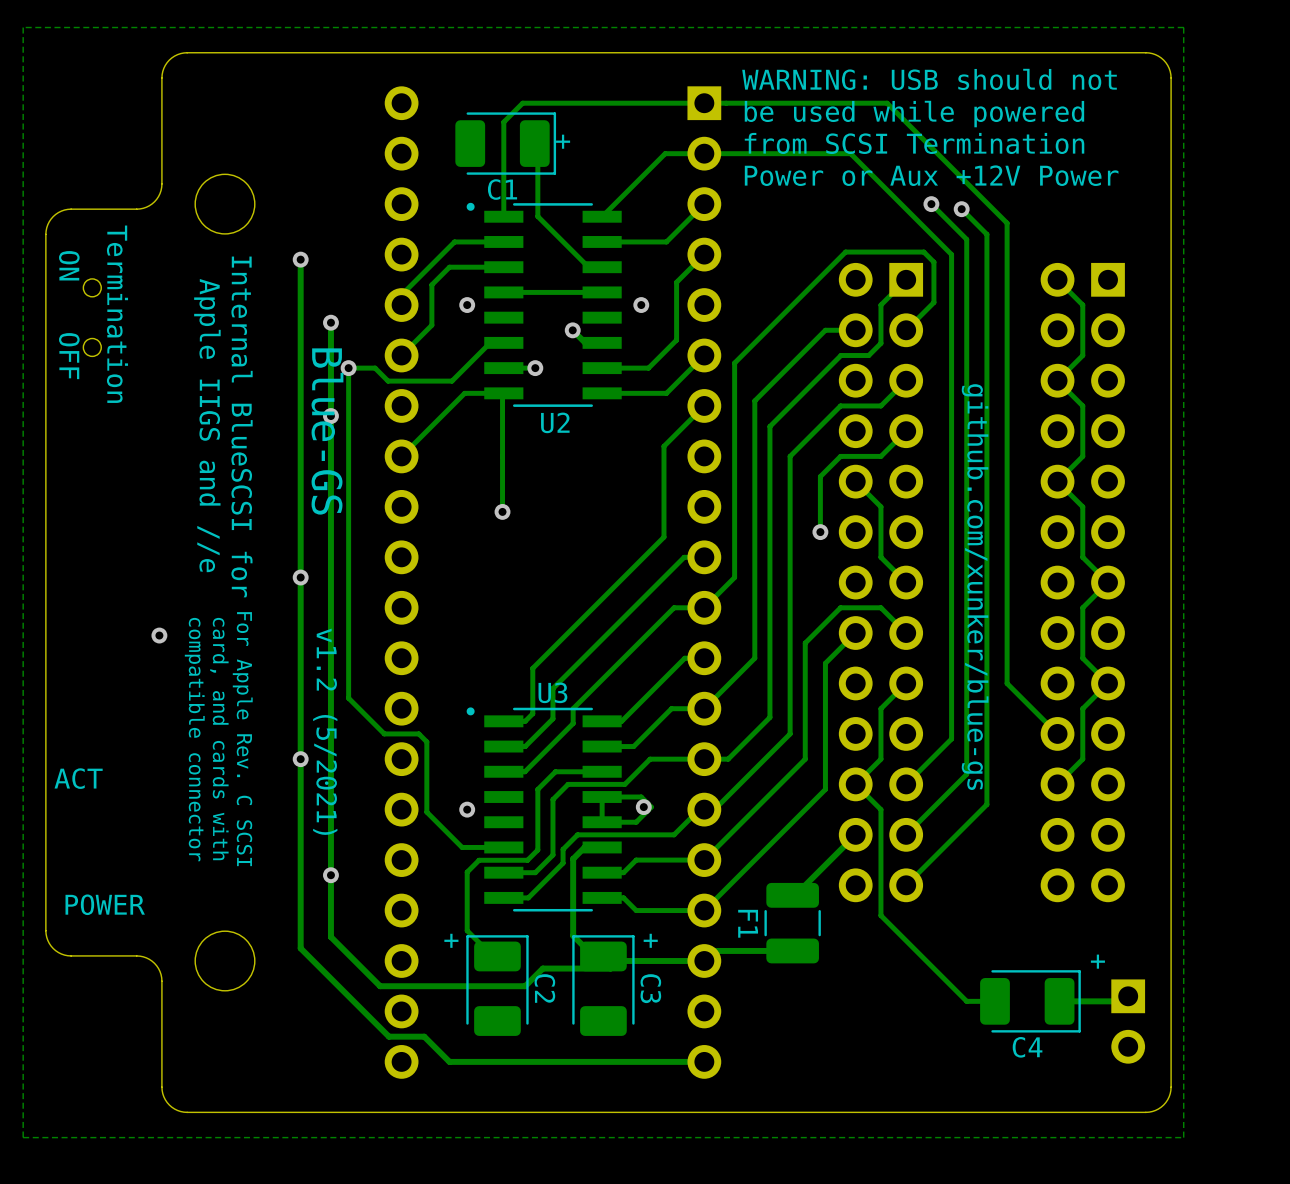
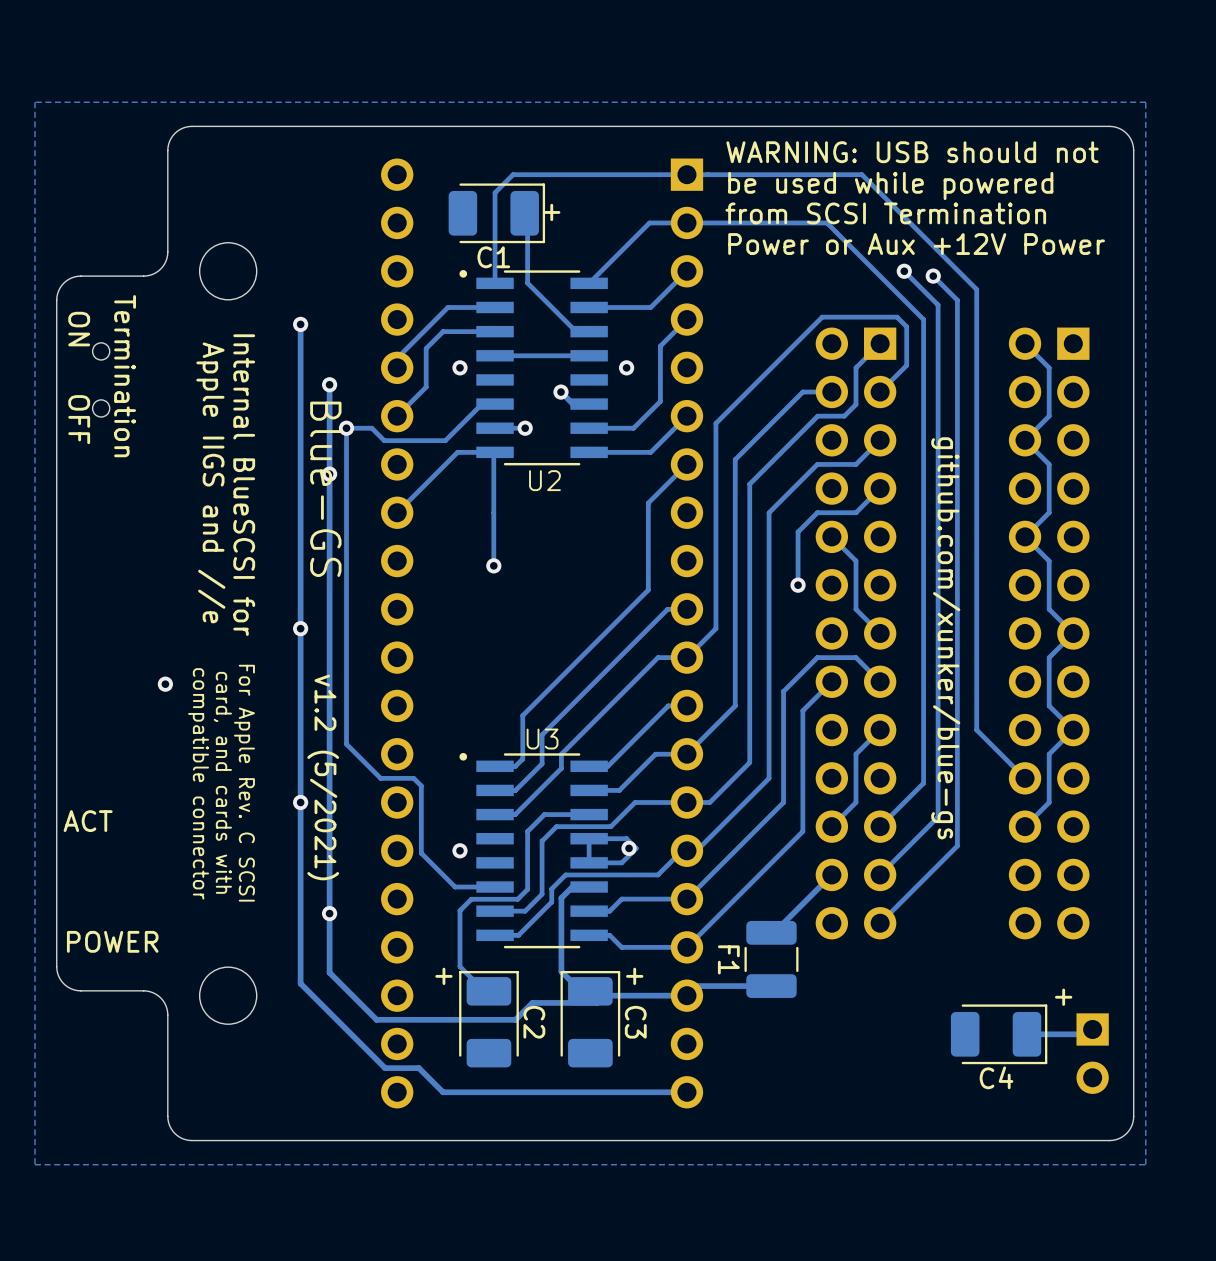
track: (855, 784) (880, 809) (880, 915) (966, 1001) (995, 1001) -> none

